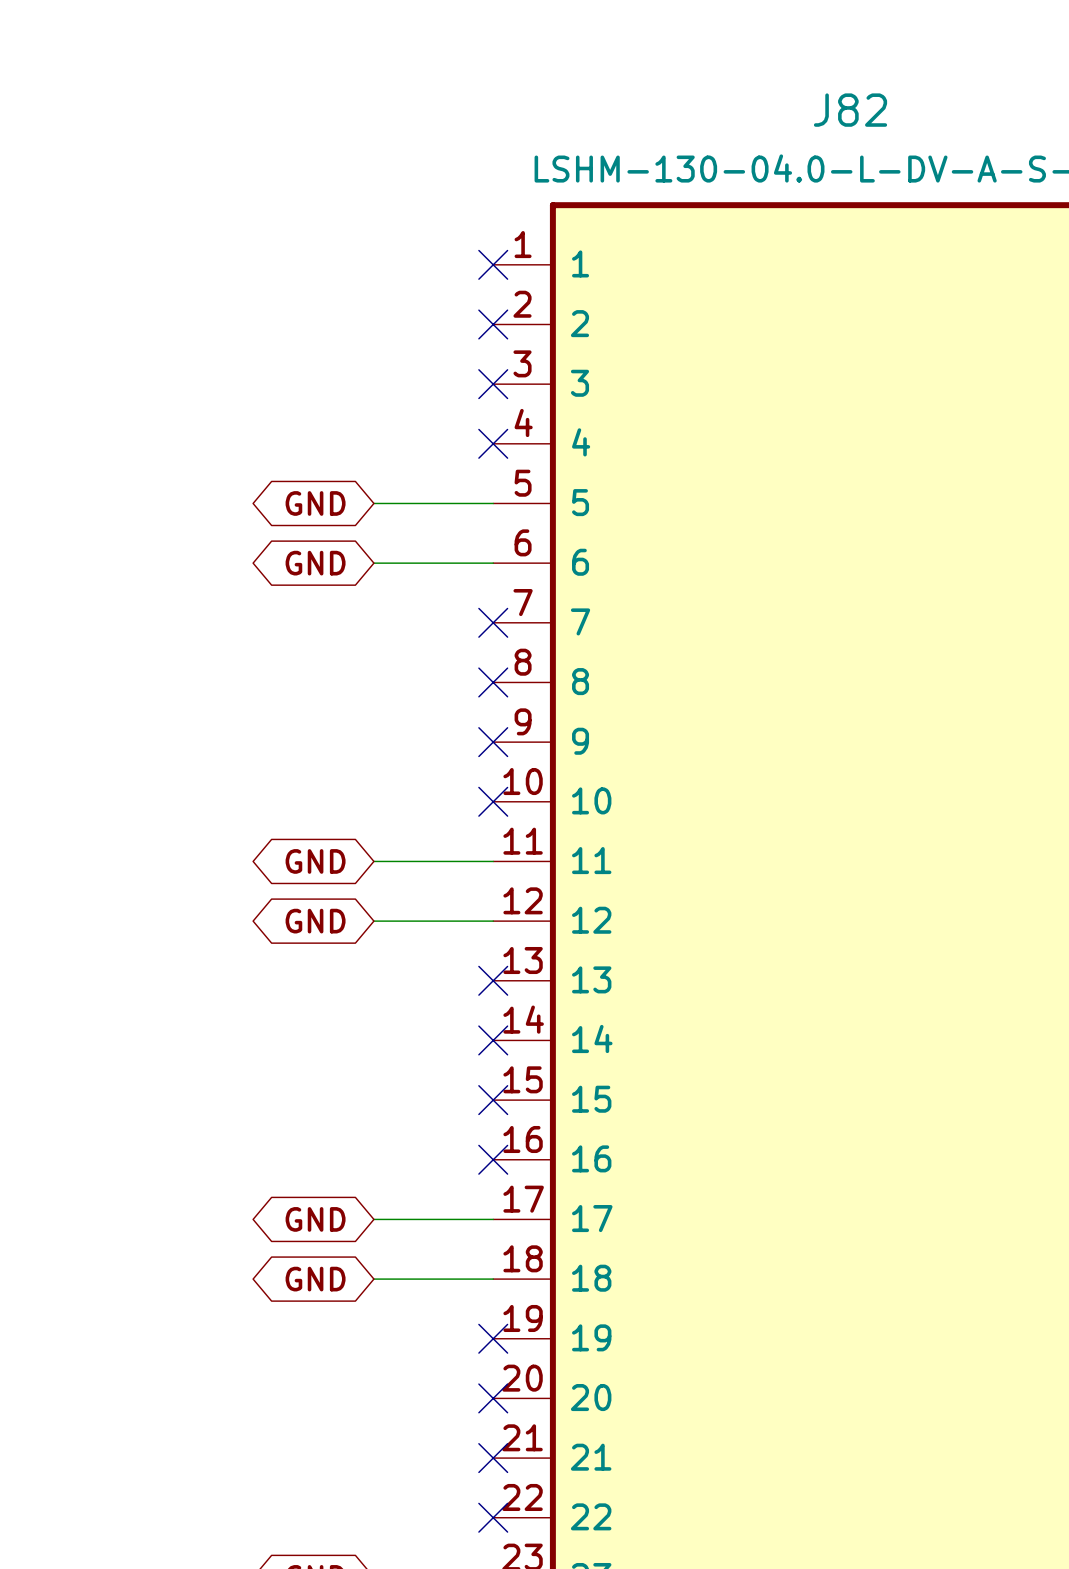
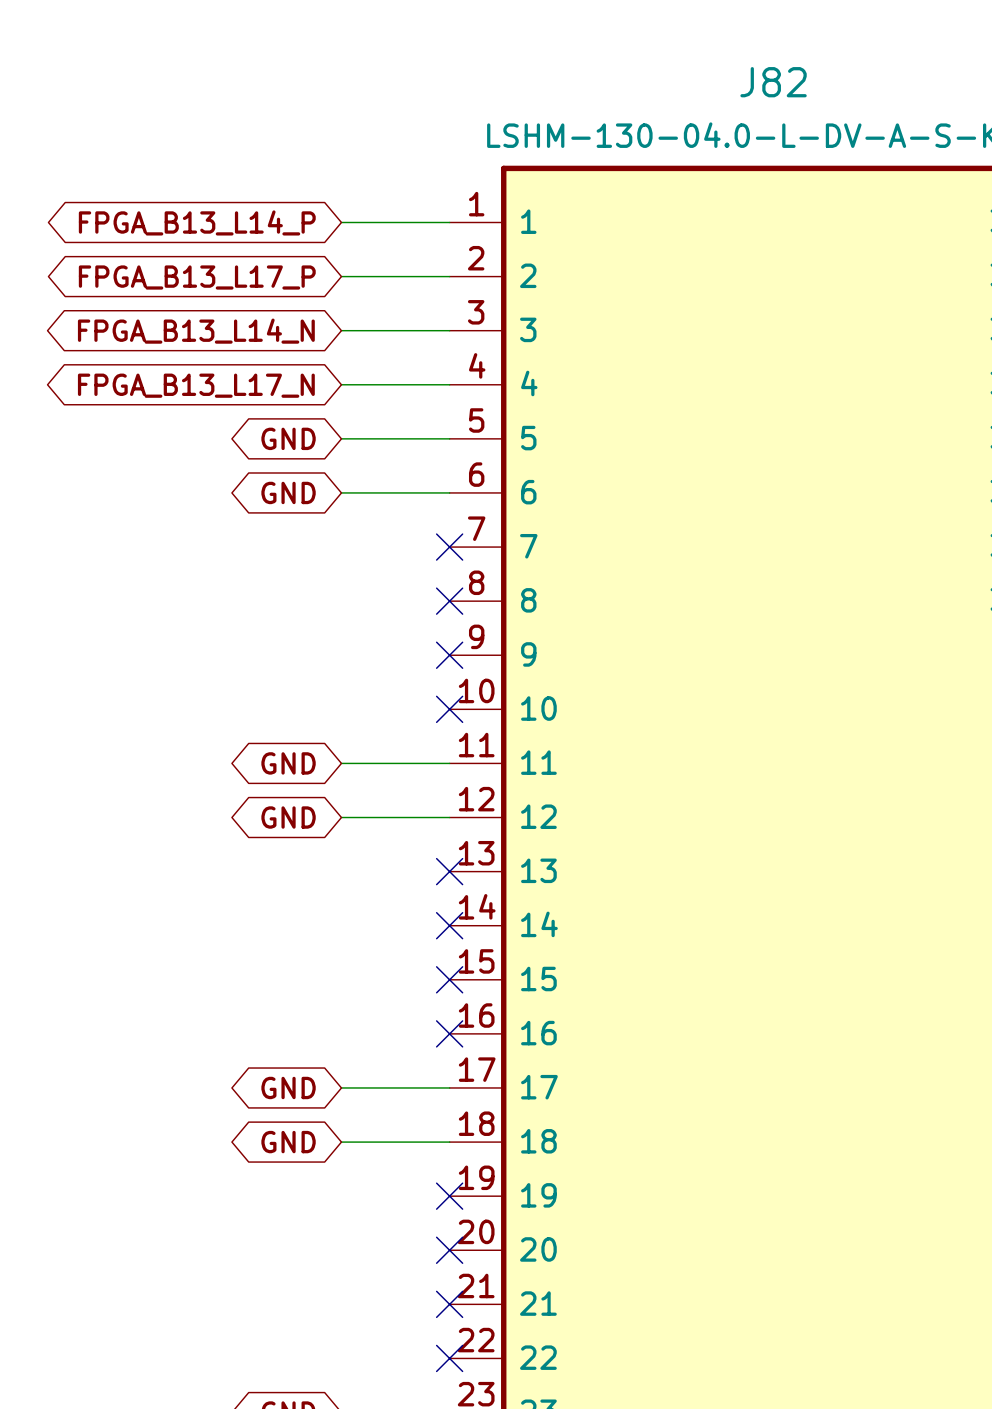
wire: none -> (341, 222) (449, 222)
no-connect mark: (493, 264) -> none
global label: none -> FPGA_B13_L14_P (197, 222)
wire: none -> (341, 276) (449, 276)
no-connect mark: (493, 324) -> none
global label: none -> FPGA_B13_L17_P (197, 277)
global label: none -> FPGA_B13_L14_N (196, 331)
wire: none -> (341, 330) (449, 330)
no-connect mark: (493, 384) -> none
wire: none -> (341, 384) (449, 384)
no-connect mark: (493, 443) -> none
global label: none -> FPGA_B13_L17_N (196, 385)

